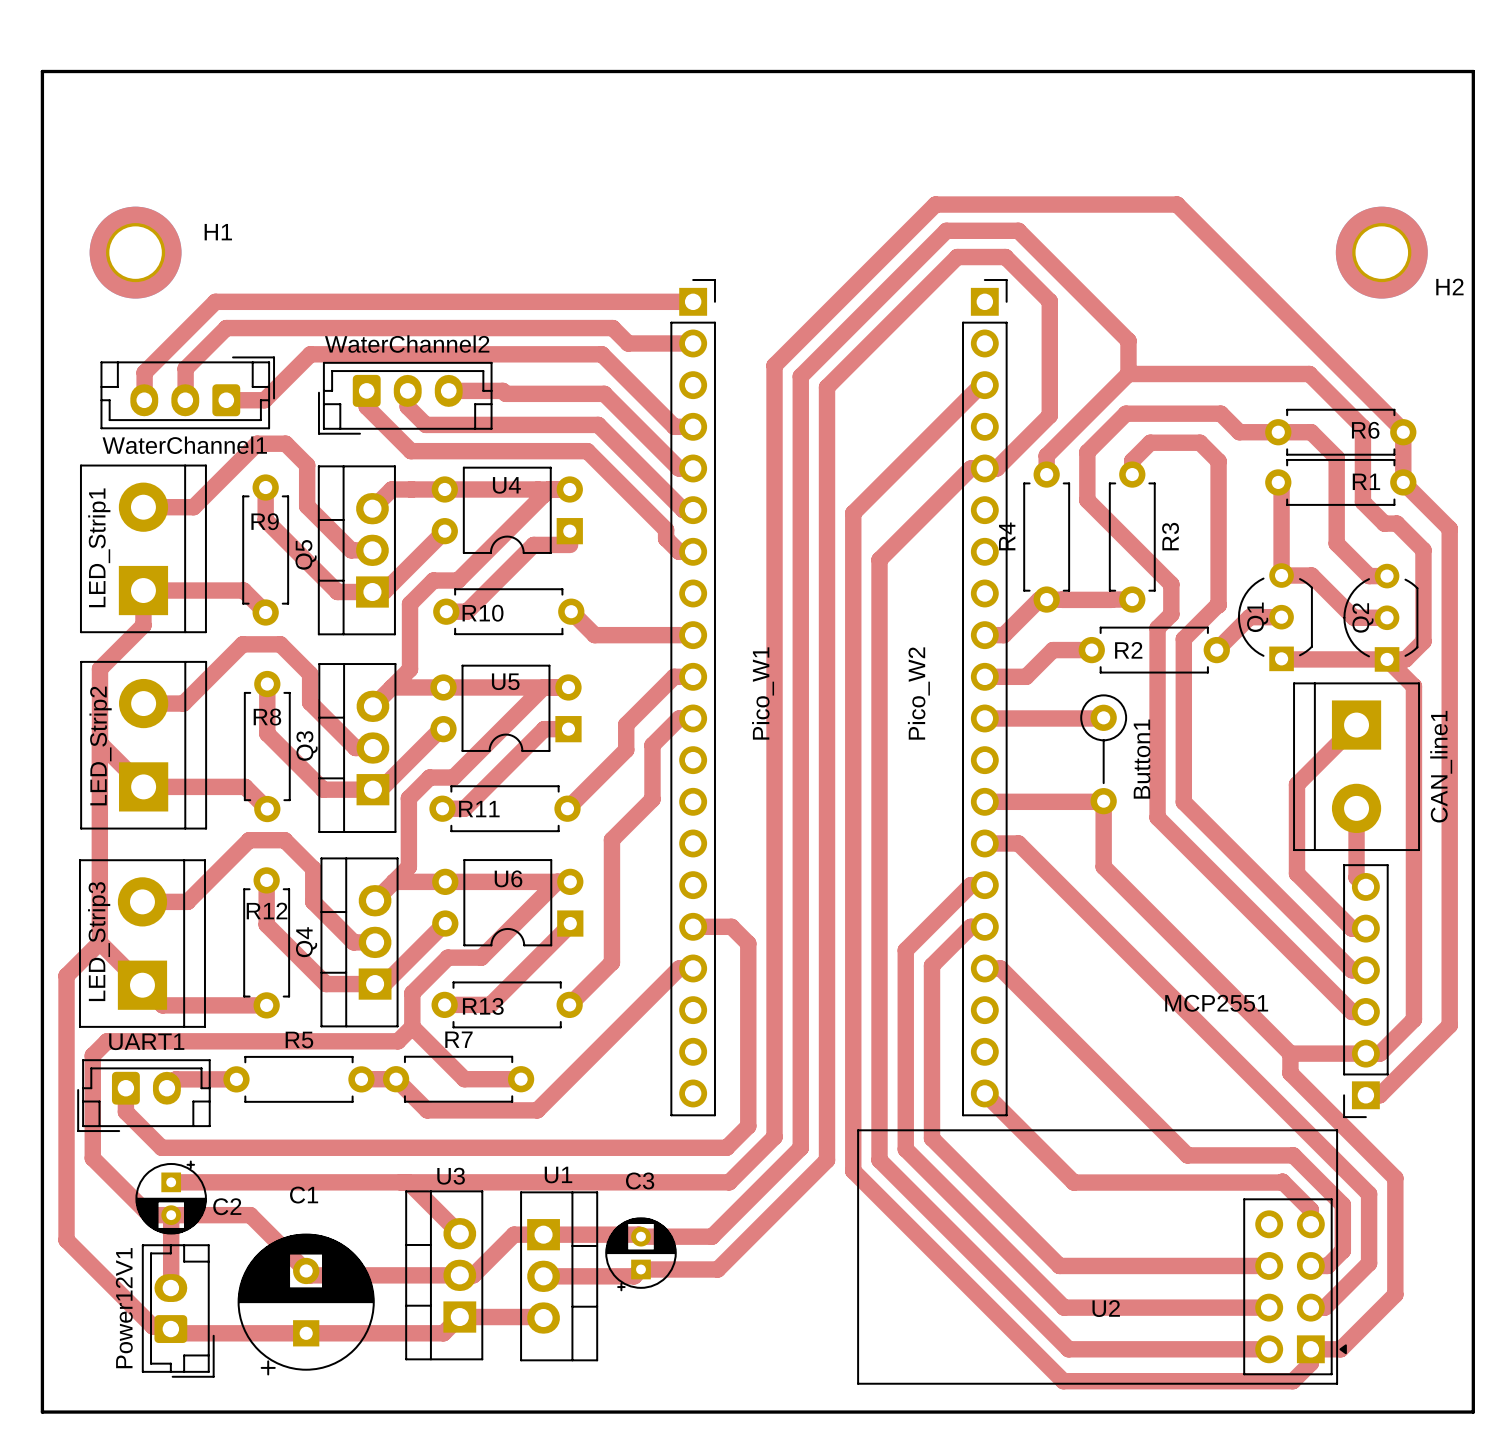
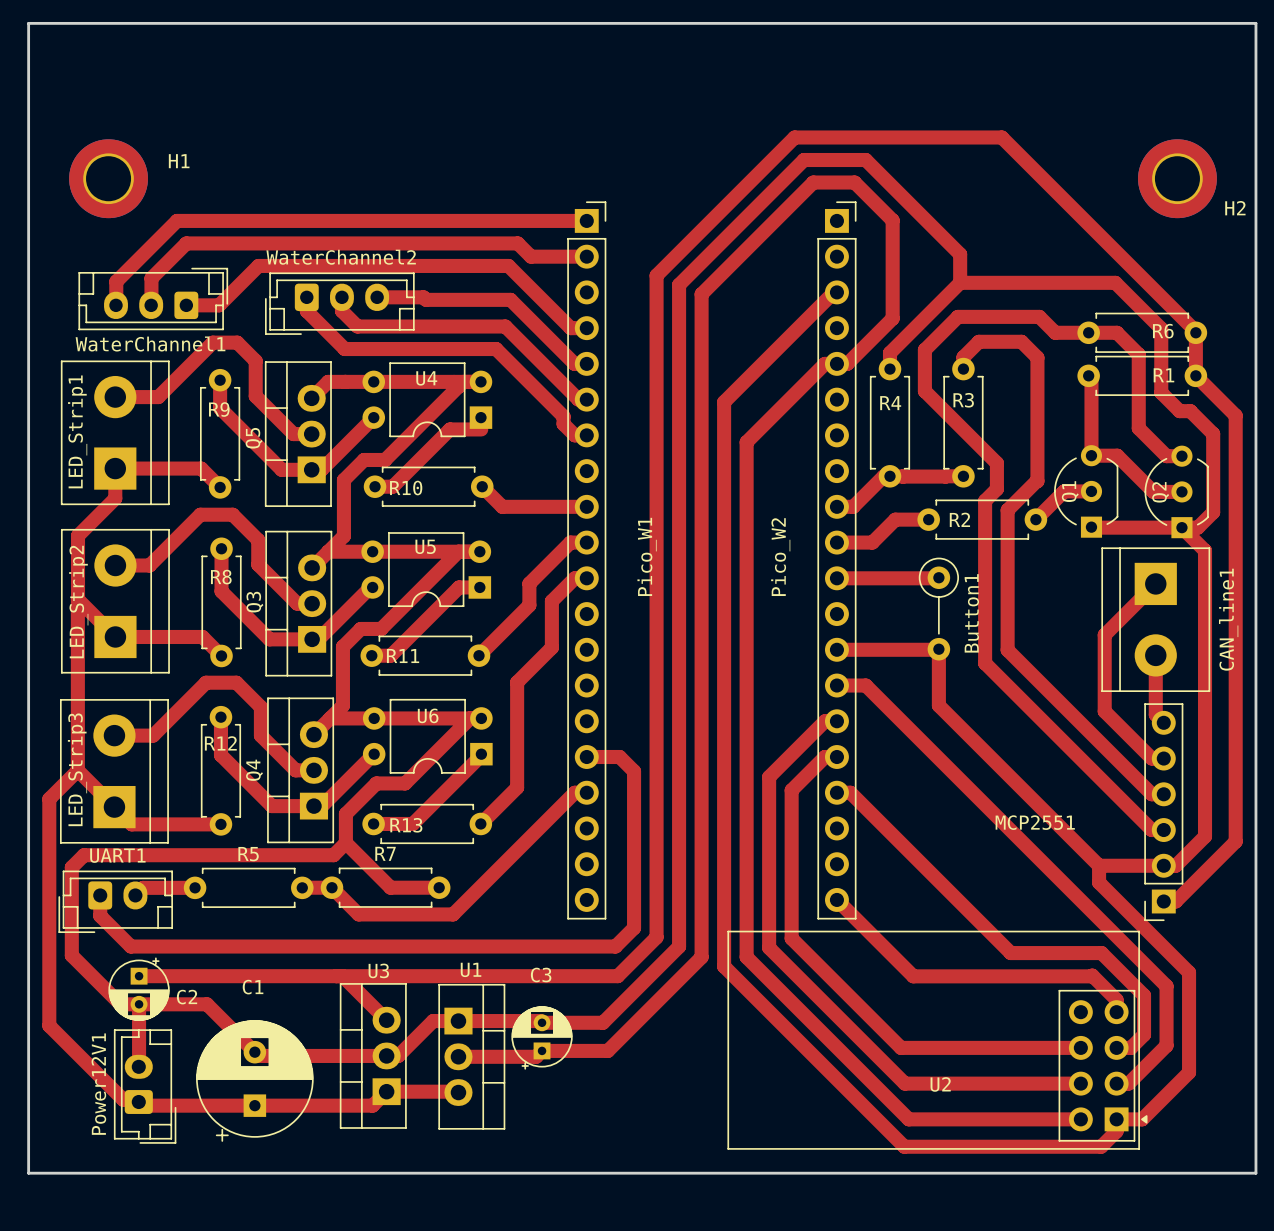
R4 name rotation: 0° (1007, 536) -> 90° clockwise (890, 403)
R4 name position: R4 (1007, 536) -> R4 (890, 403)
R3 name rotation: 0° (1170, 536) -> 90° clockwise (963, 400)
R3 name position: R3 (1170, 536) -> R3 (963, 400)

